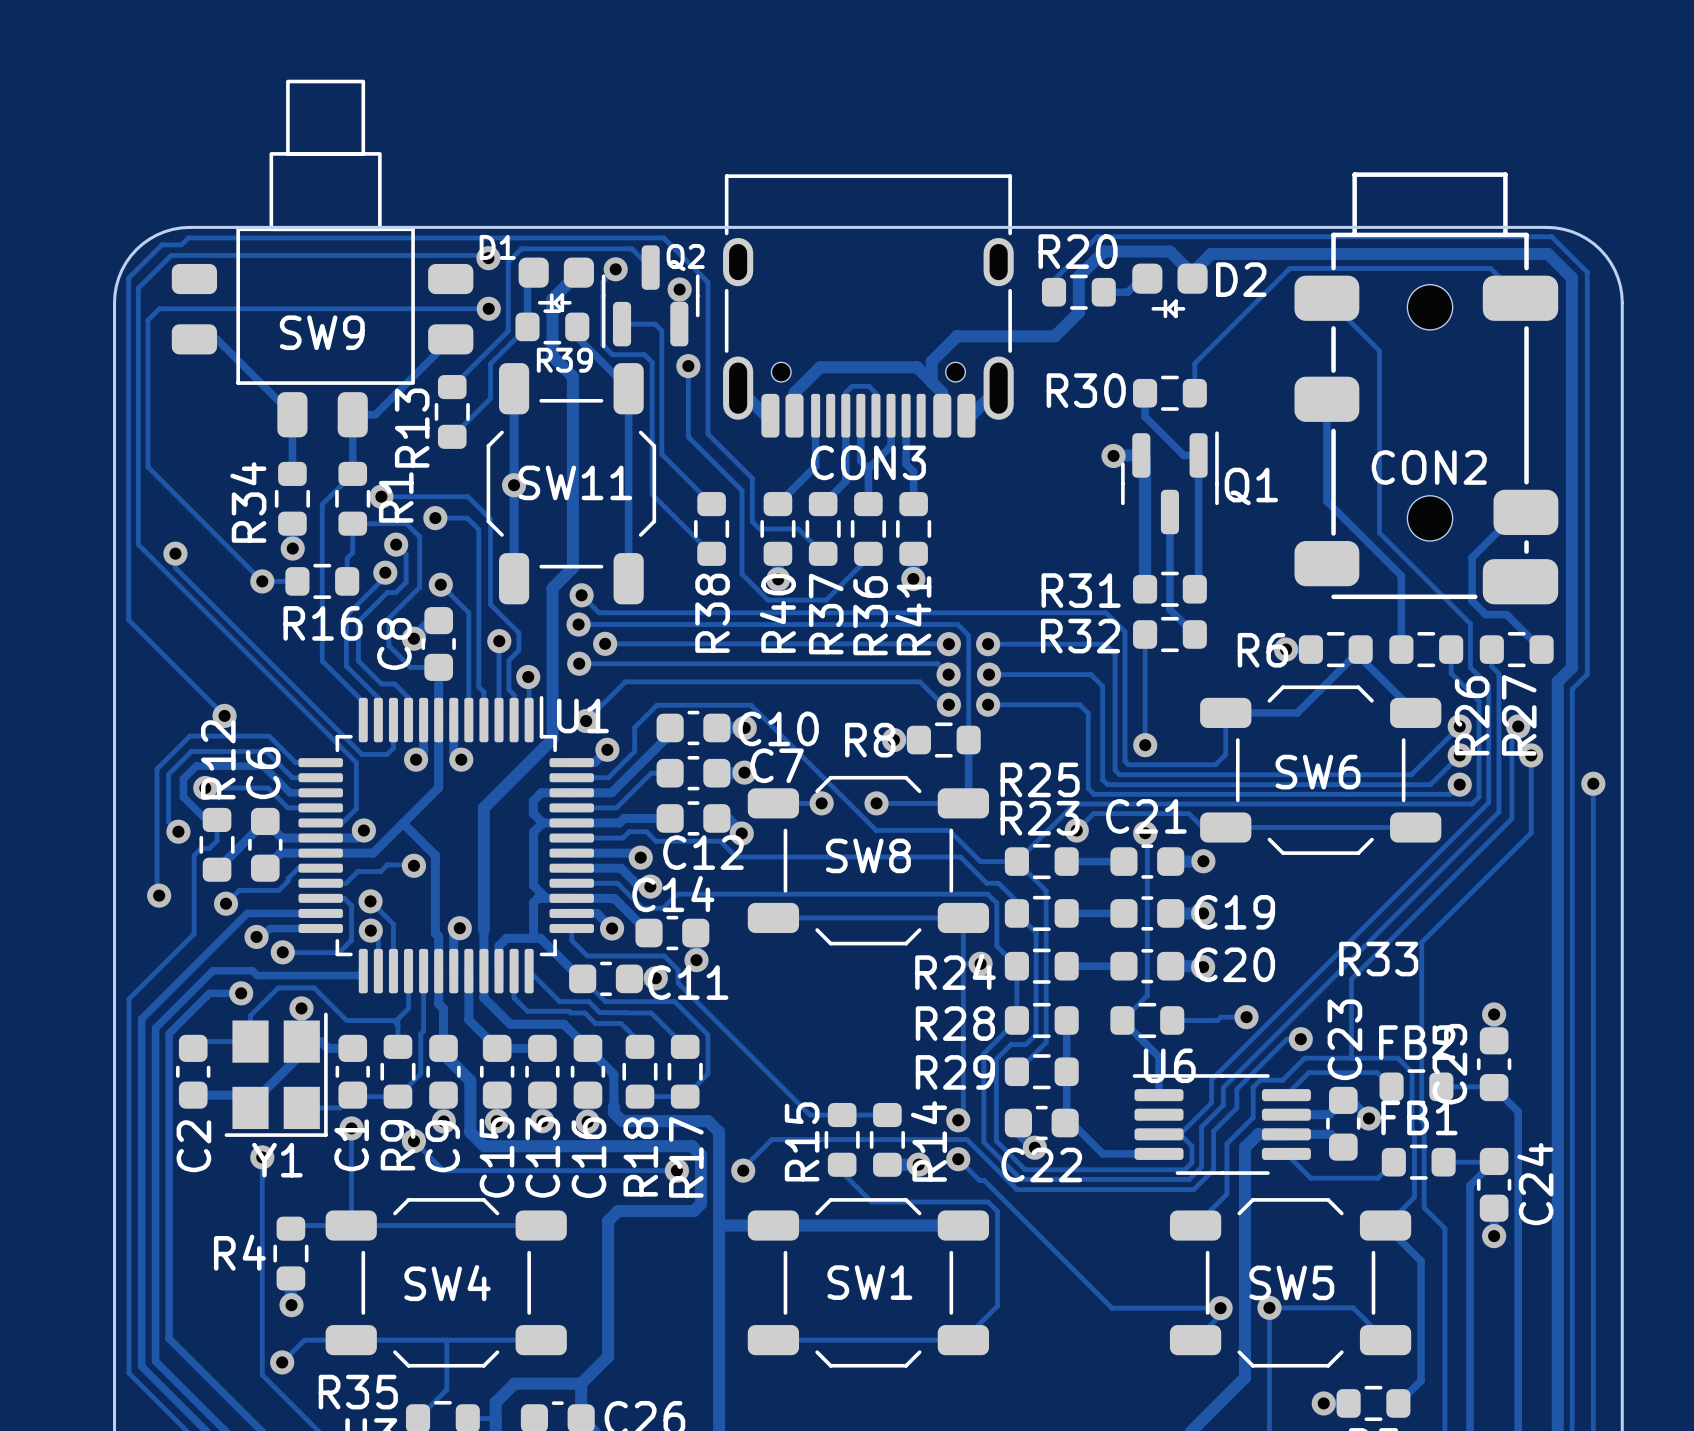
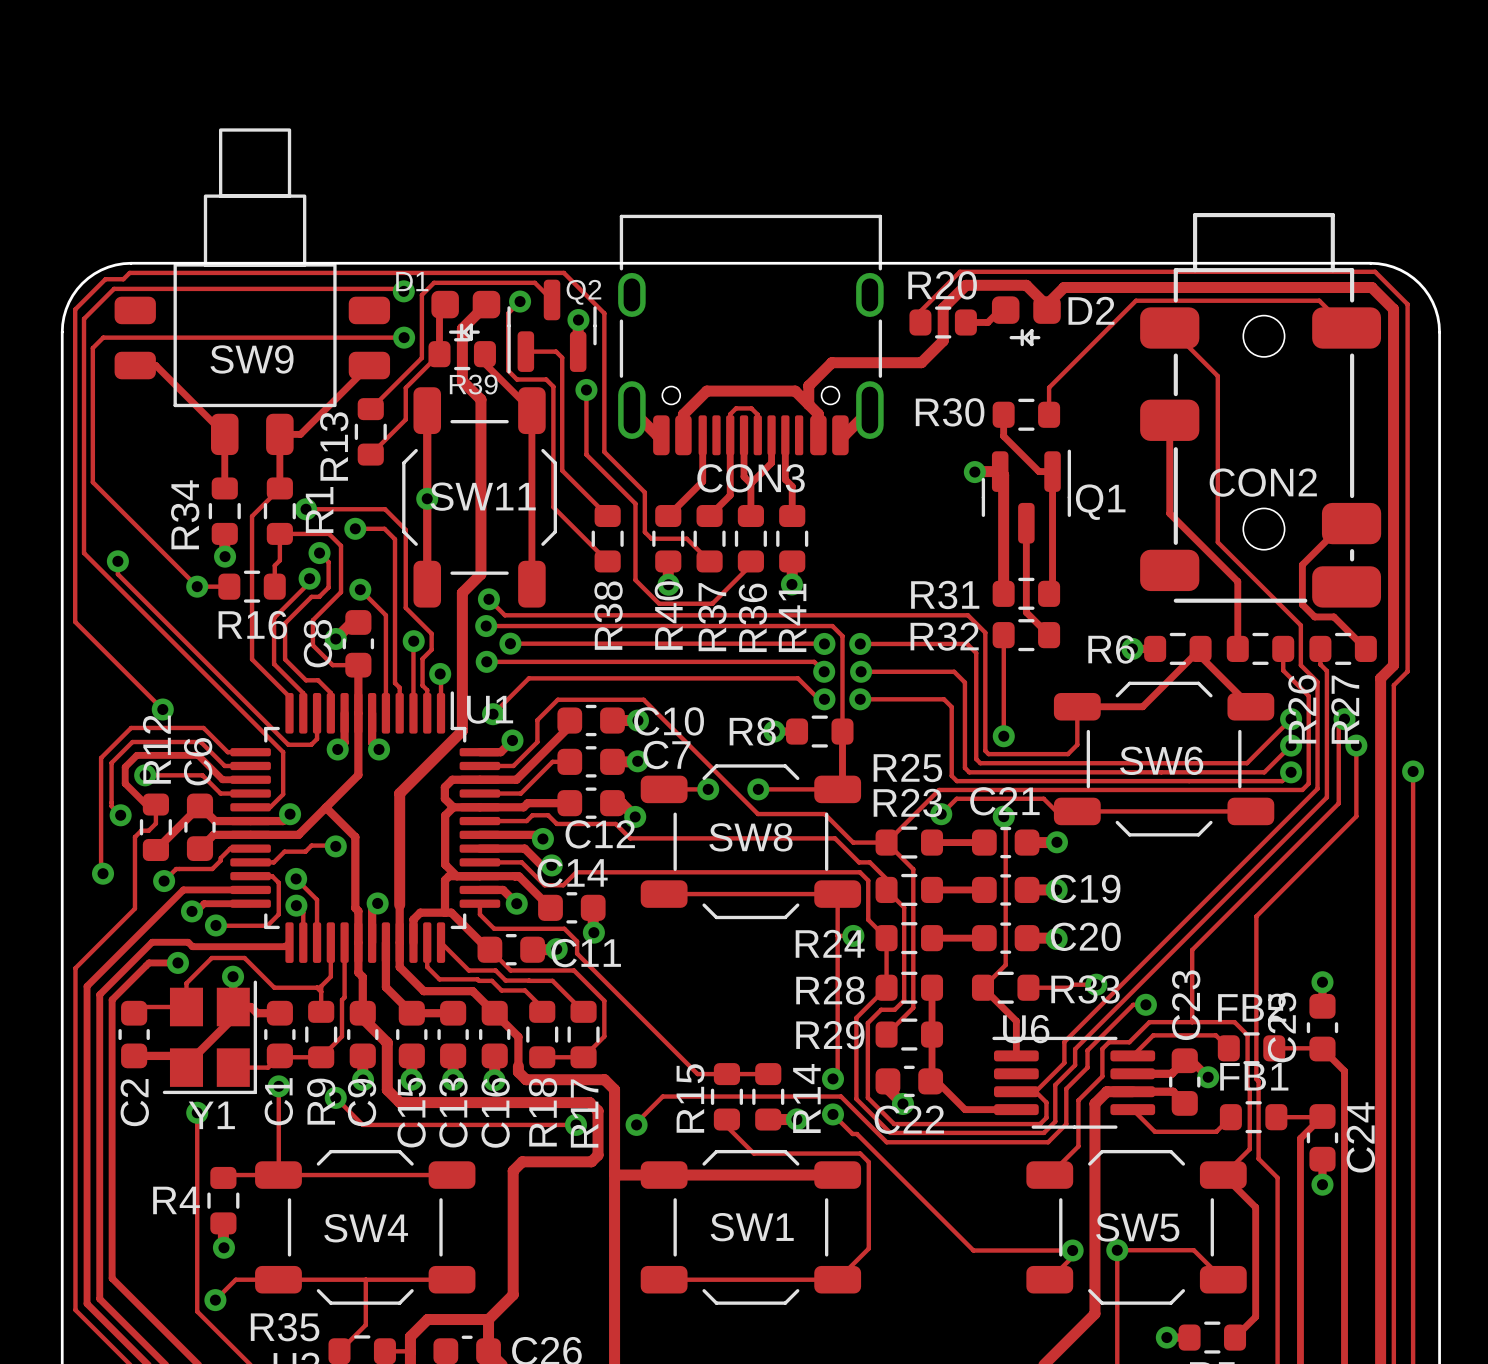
R33 name position: R33 (1378, 959) -> R33 (1085, 989)

